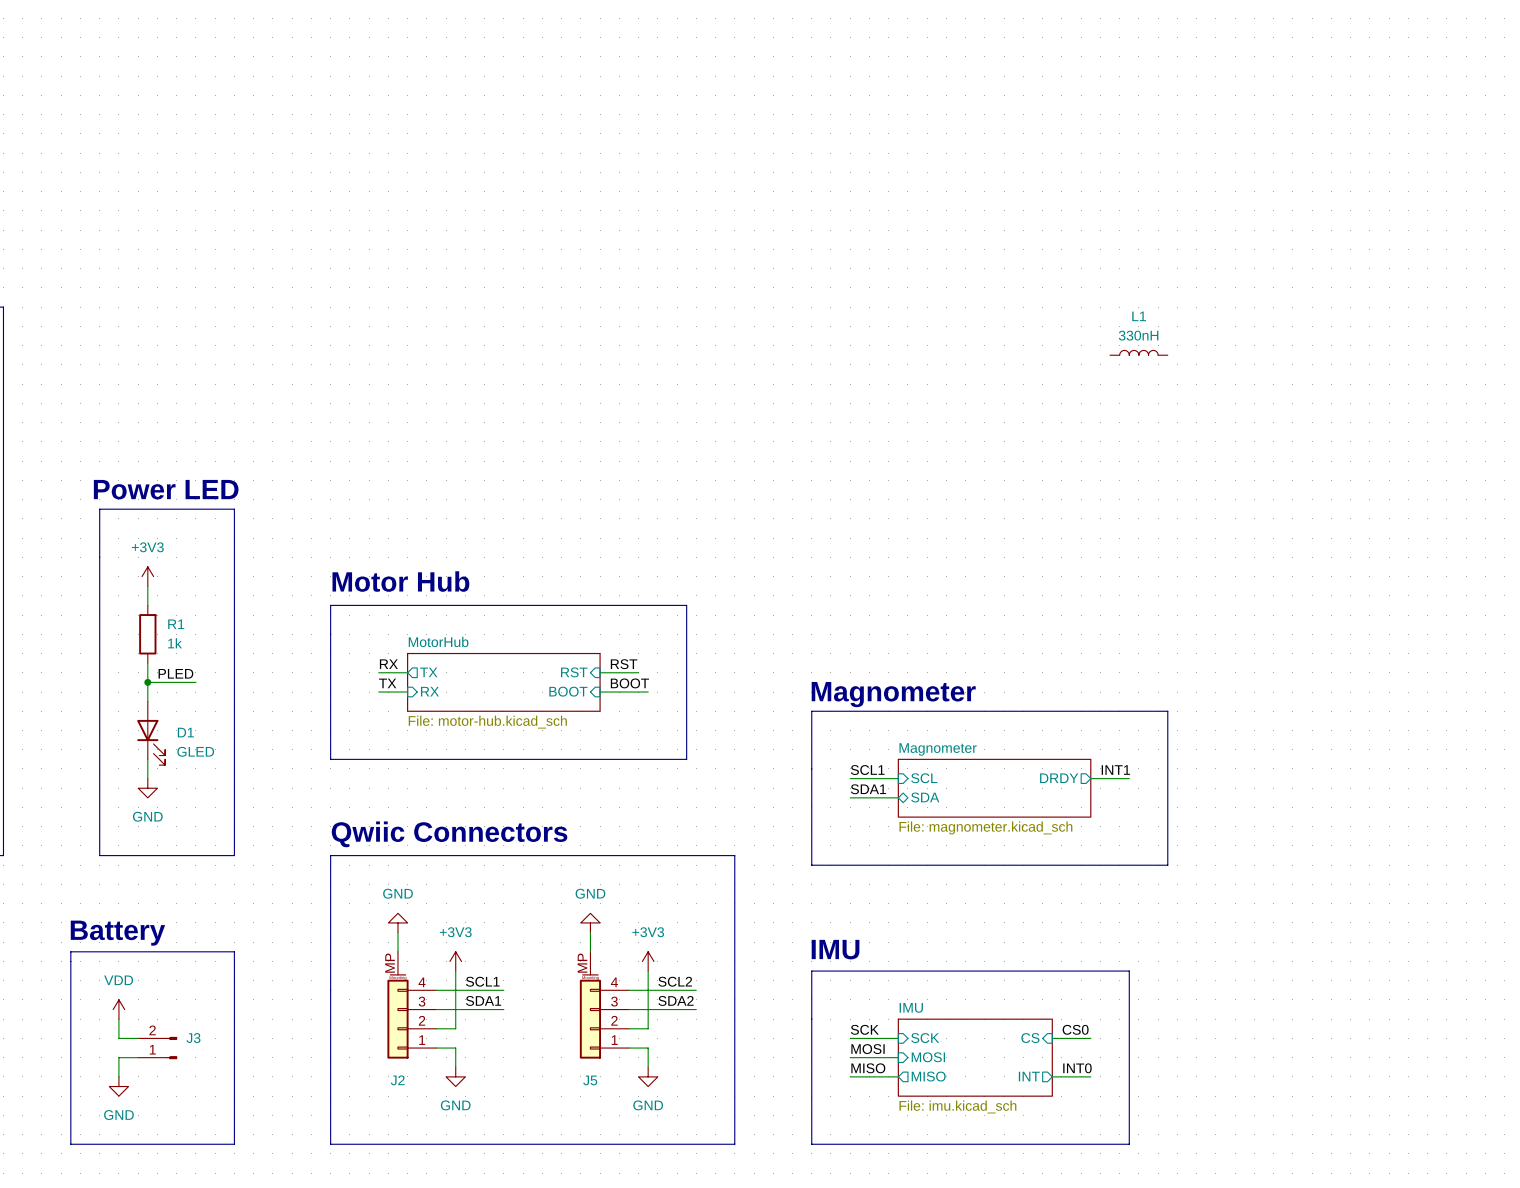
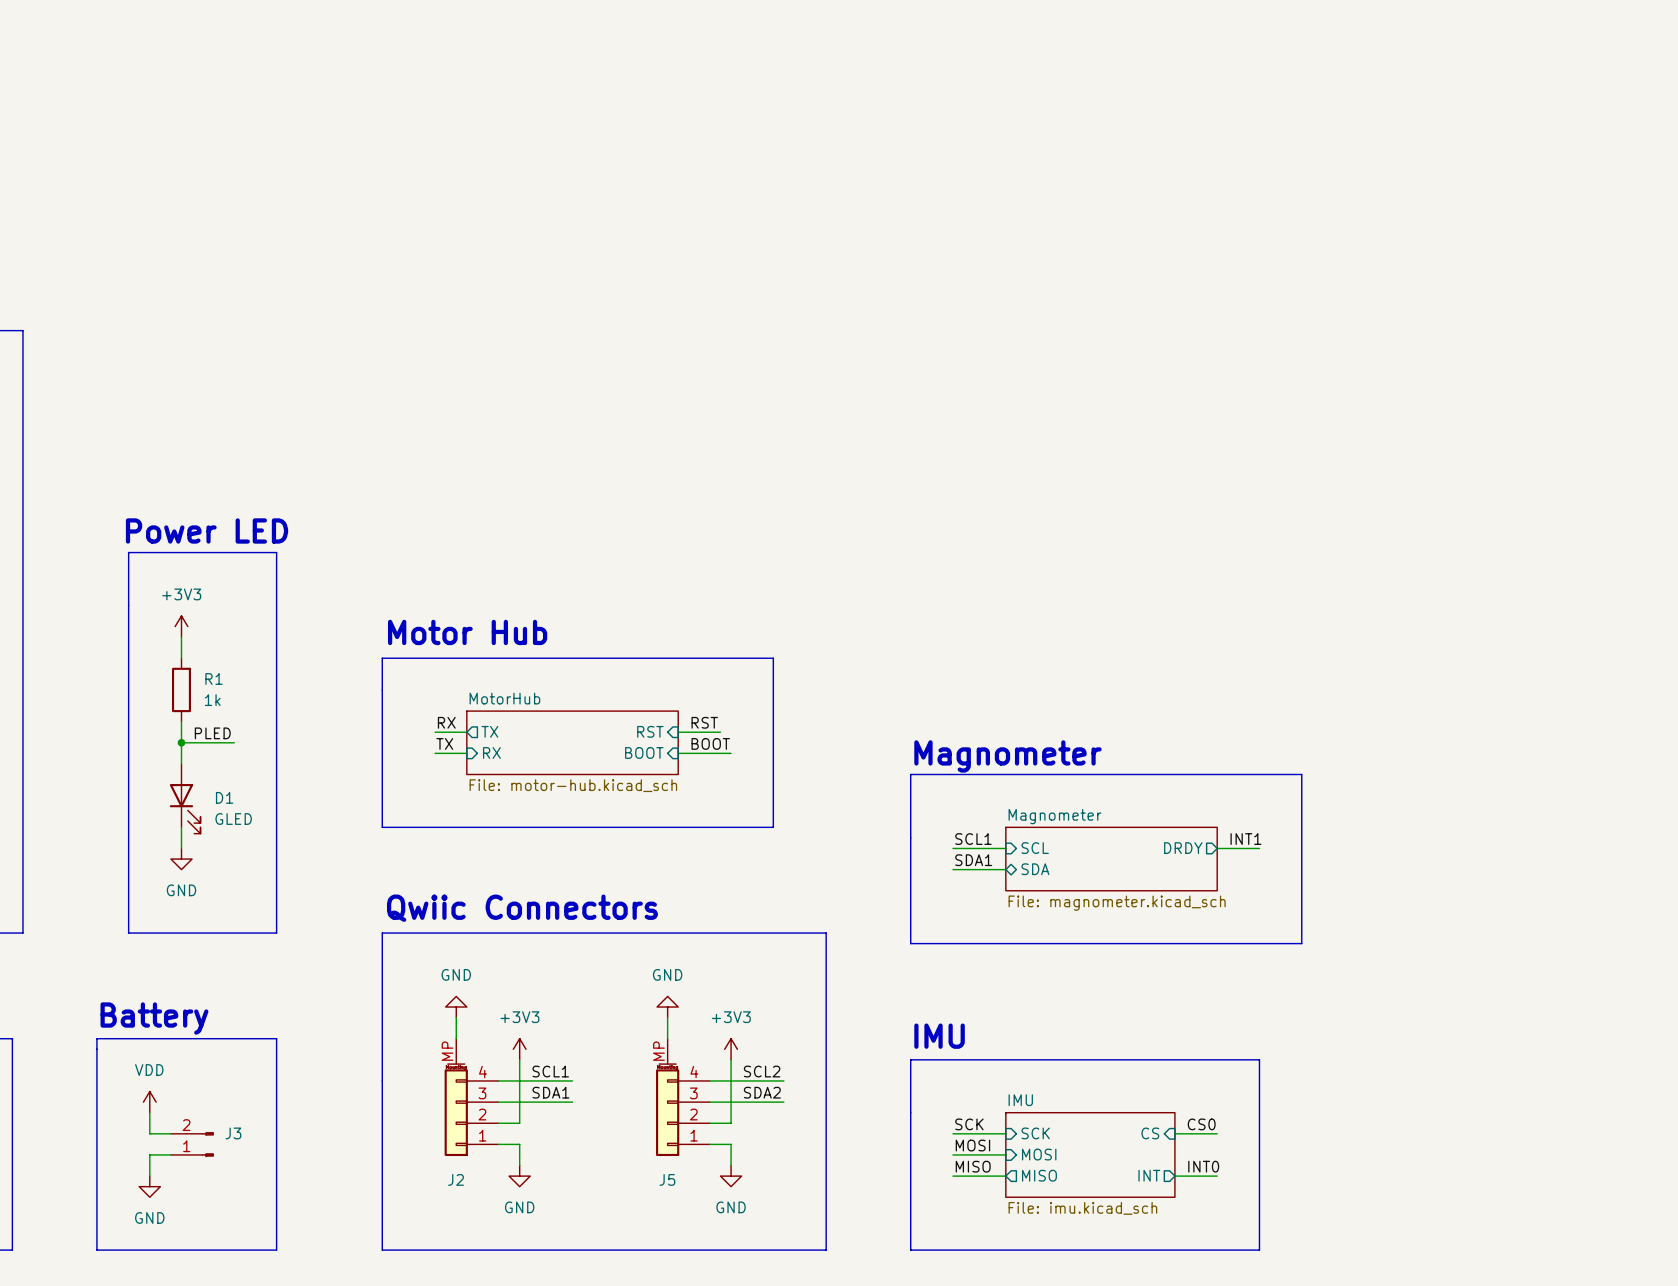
L1: 330nH (1138, 352) -> none

